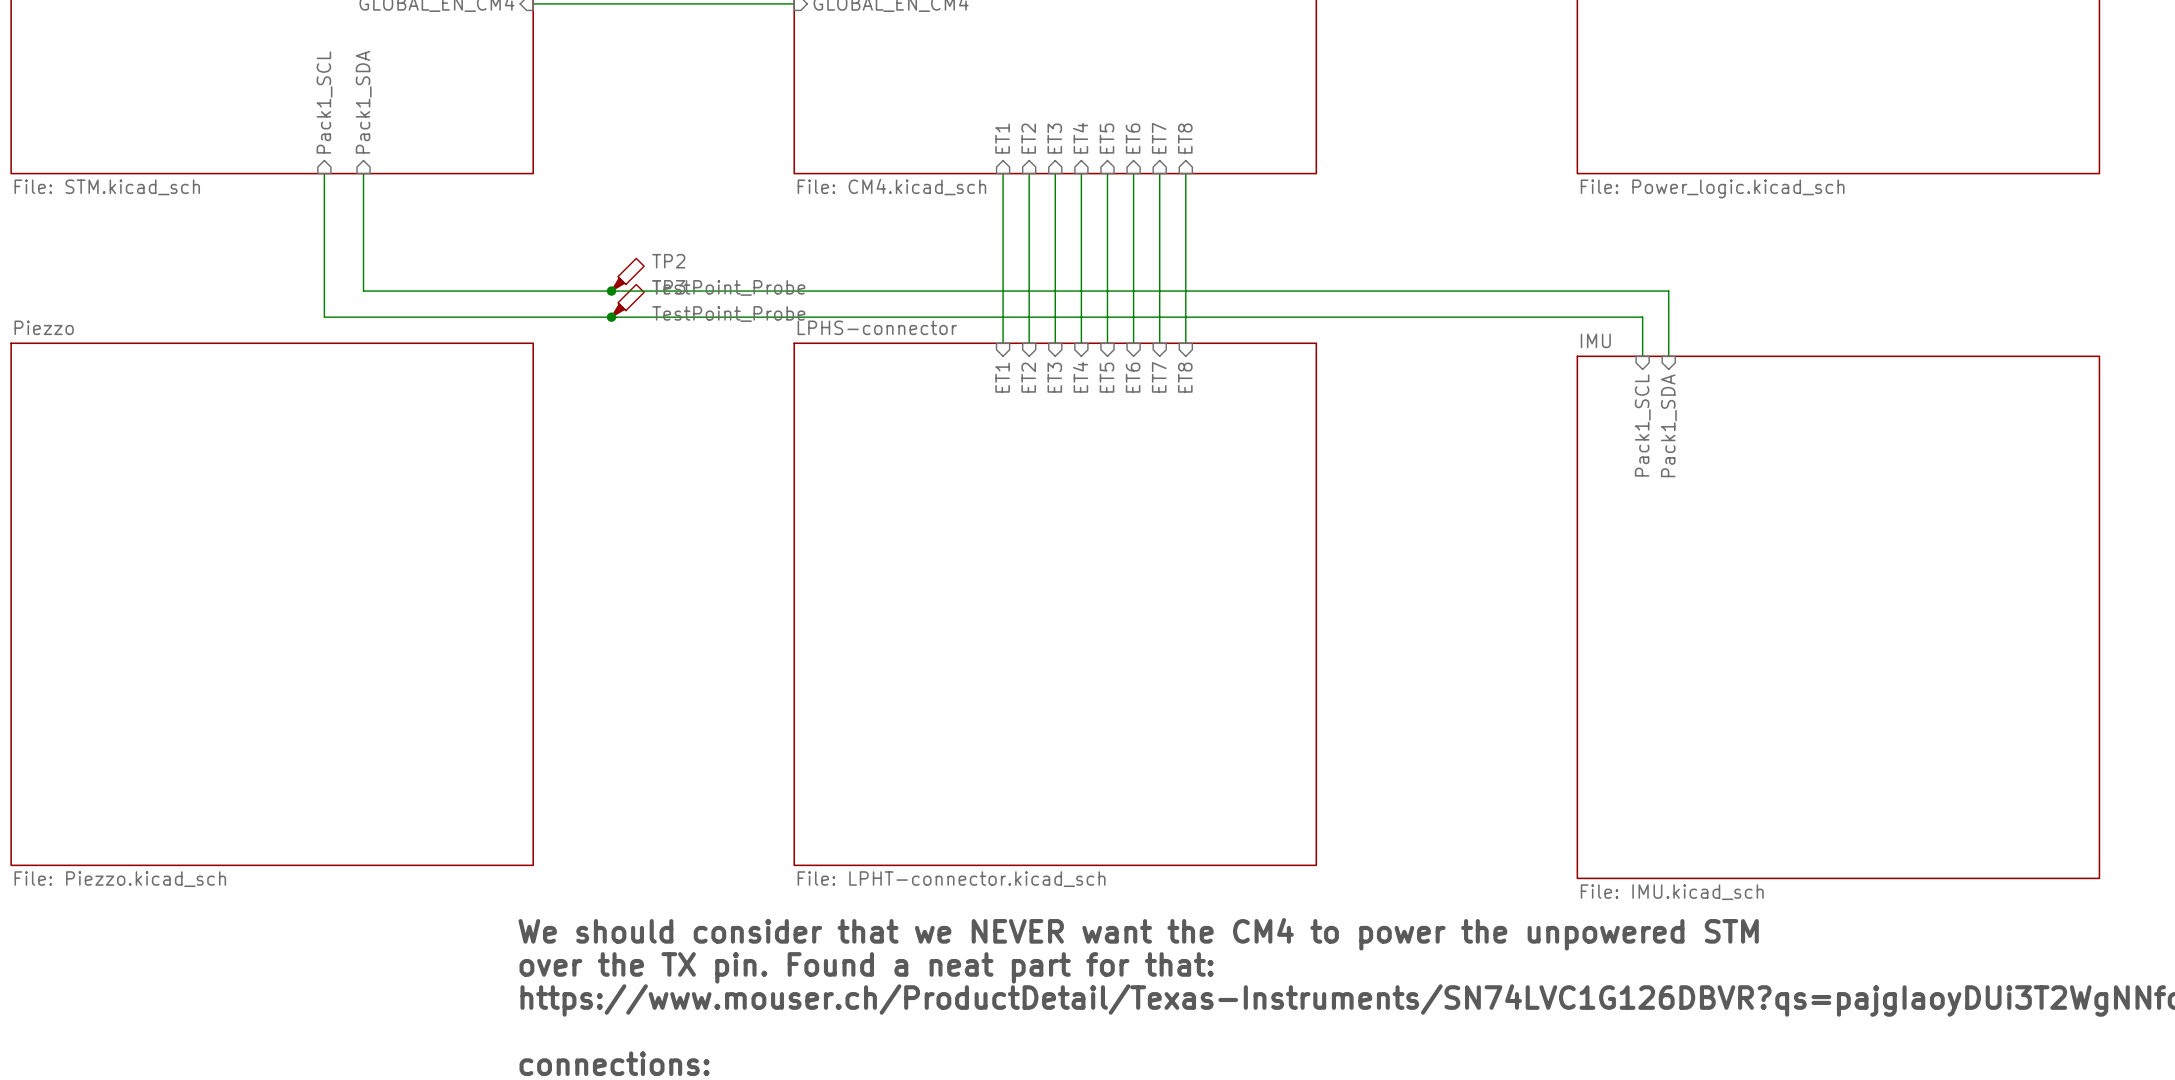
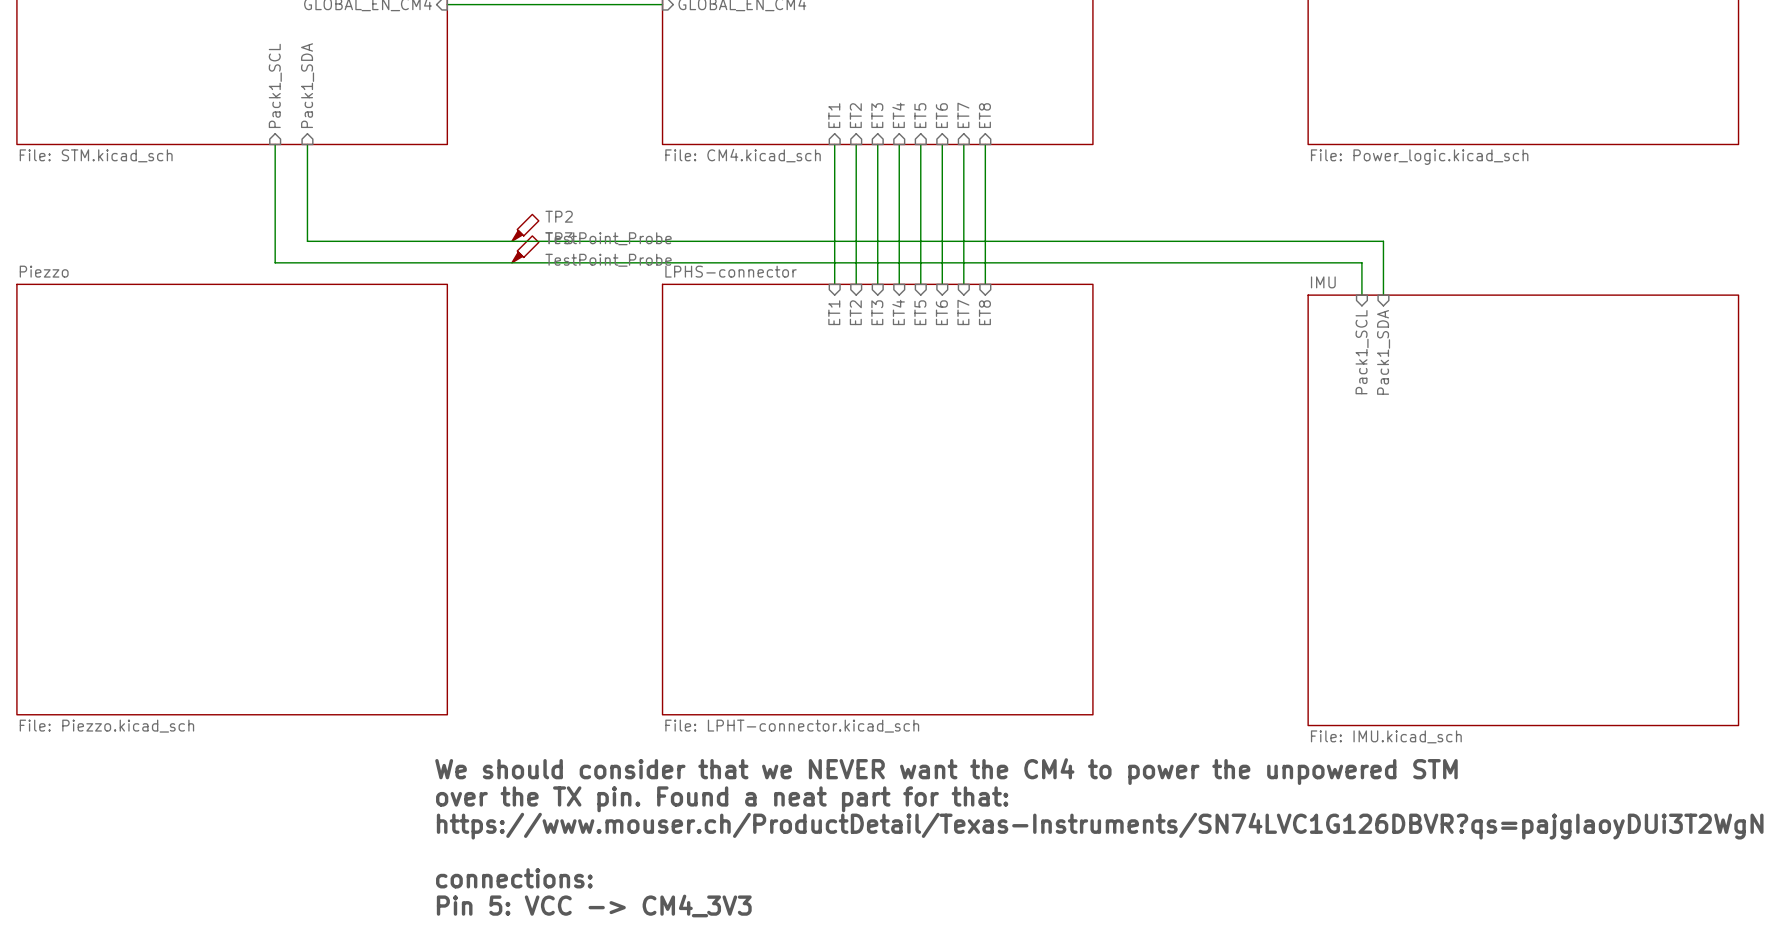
junction: (611, 291) -> none
junction: (611, 317) -> none

